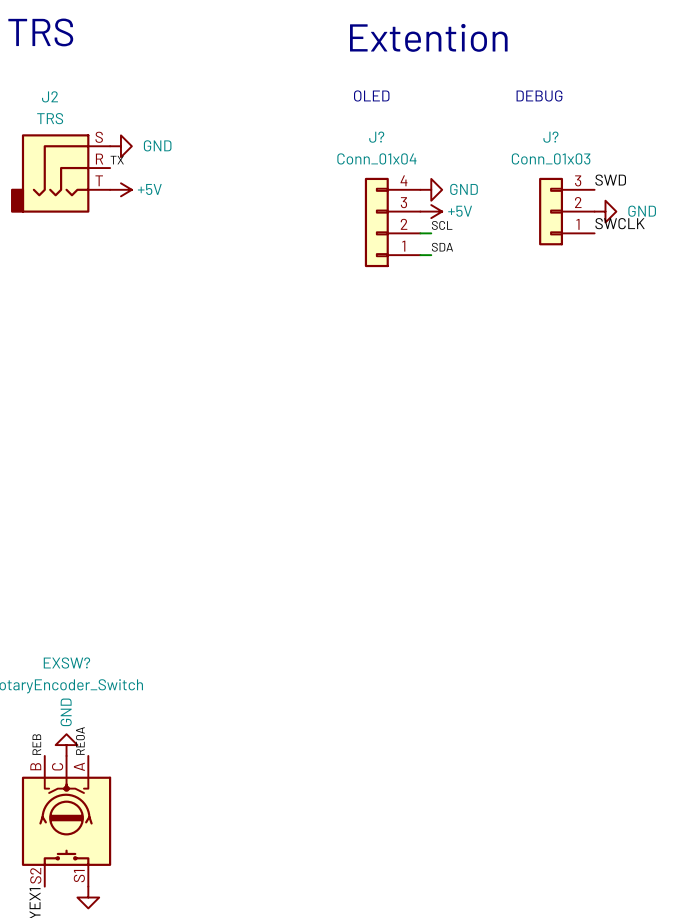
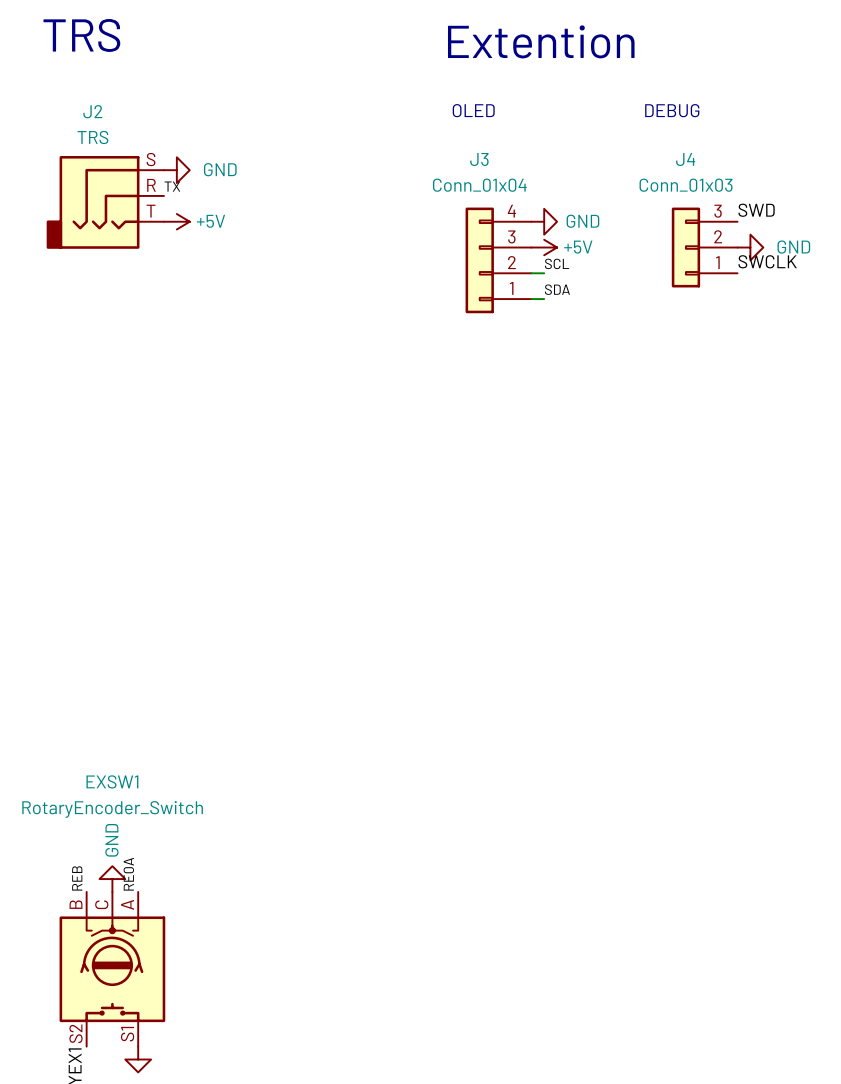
J? name: J? (376, 137) -> J3 (479, 159)
J? name: J? (550, 137) -> J4 (685, 159)
EXSW? name: EXSW? (66, 663) -> EXSW1 (112, 781)

